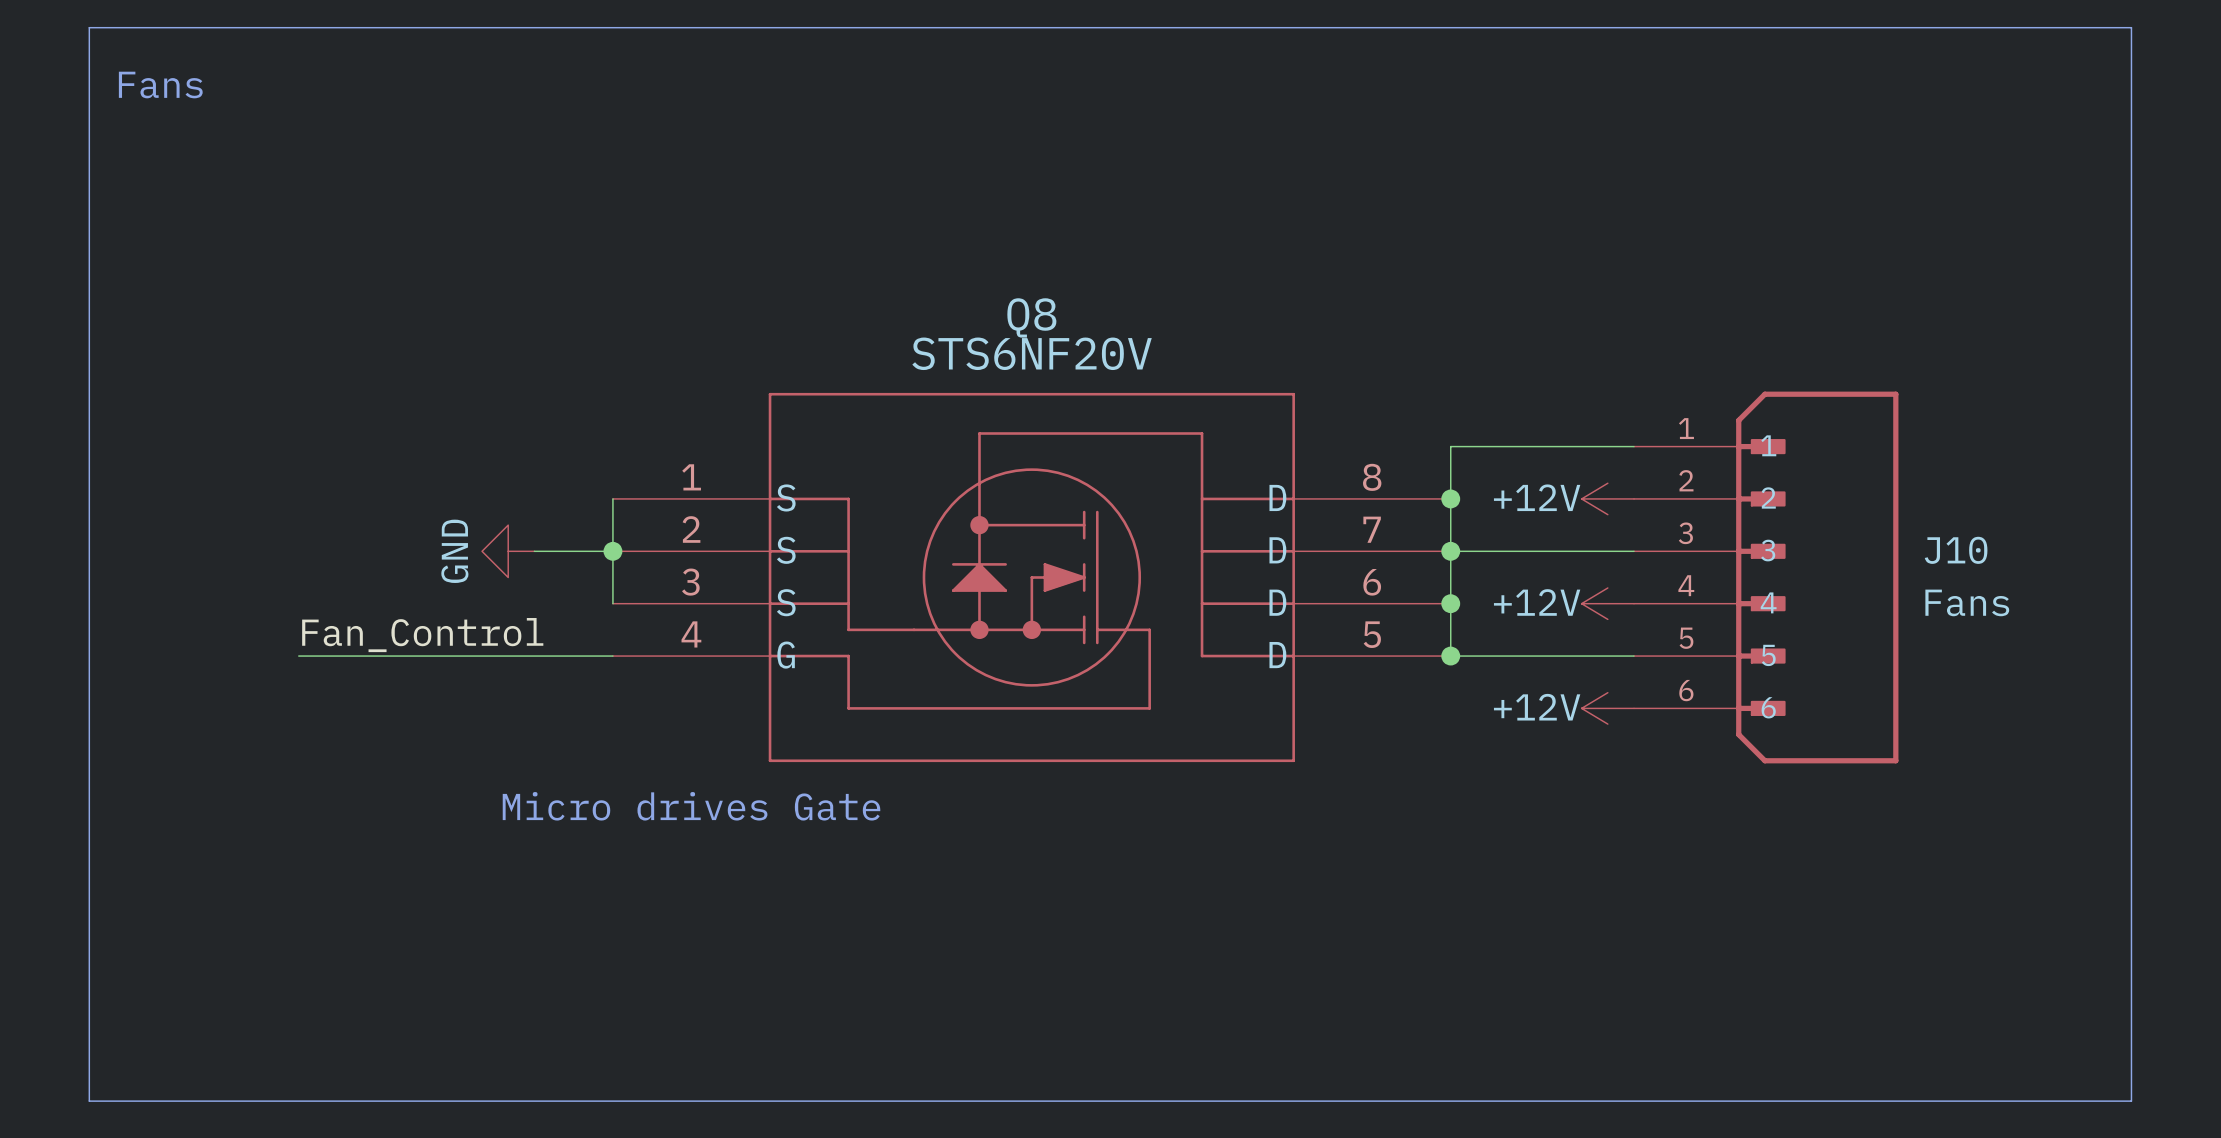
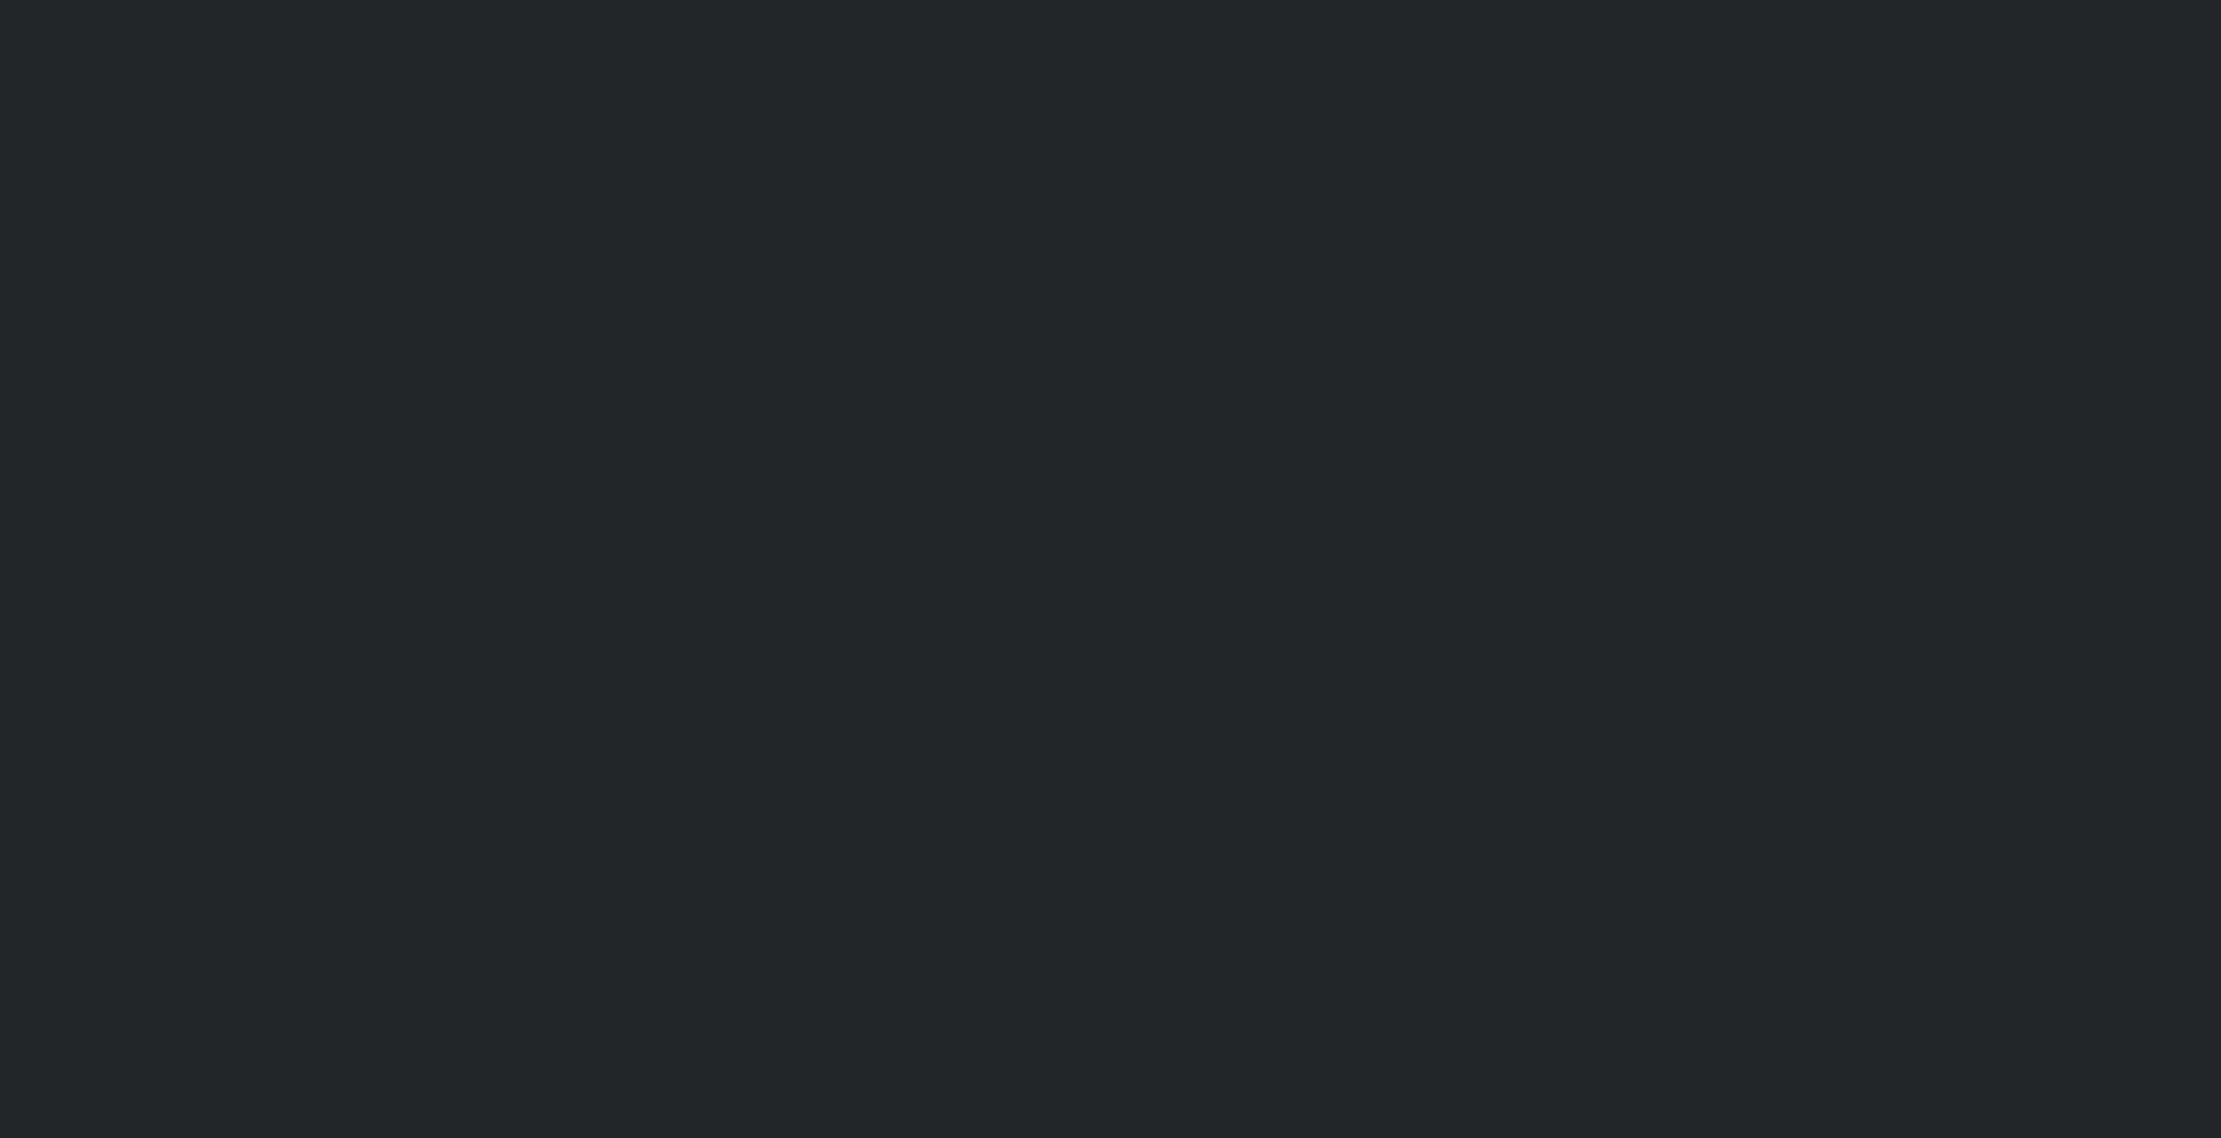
line: (89, 27) (2131, 27) (2131, 1101) (89, 1101) (89, 27) -> none
text: Fans (160, 85) -> none
wire: (1634, 446) (1450, 446) (1450, 656) (1634, 656) -> none
wire: (612, 498) (612, 603) -> none
junction: (1450, 498) -> none
power symbol: +12V (1607, 498) -> none
power symbol: GND (508, 551) -> none
wire: (534, 551) (612, 551) -> none
junction: (612, 551) -> none
wire: (1450, 551) (1634, 551) -> none
junction: (1450, 551) -> none
Q8: STS6NF20V (1031, 577) -> none
J10: Fans (1766, 577) -> none
junction: (1450, 603) -> none
power symbol: +12V (1607, 603) -> none
label: Fan_Control (422, 635) -> none
wire: (298, 656) (612, 656) -> none
junction: (1450, 656) -> none
power symbol: +12V (1607, 708) -> none
text: Micro drives Gate (691, 806) -> none

